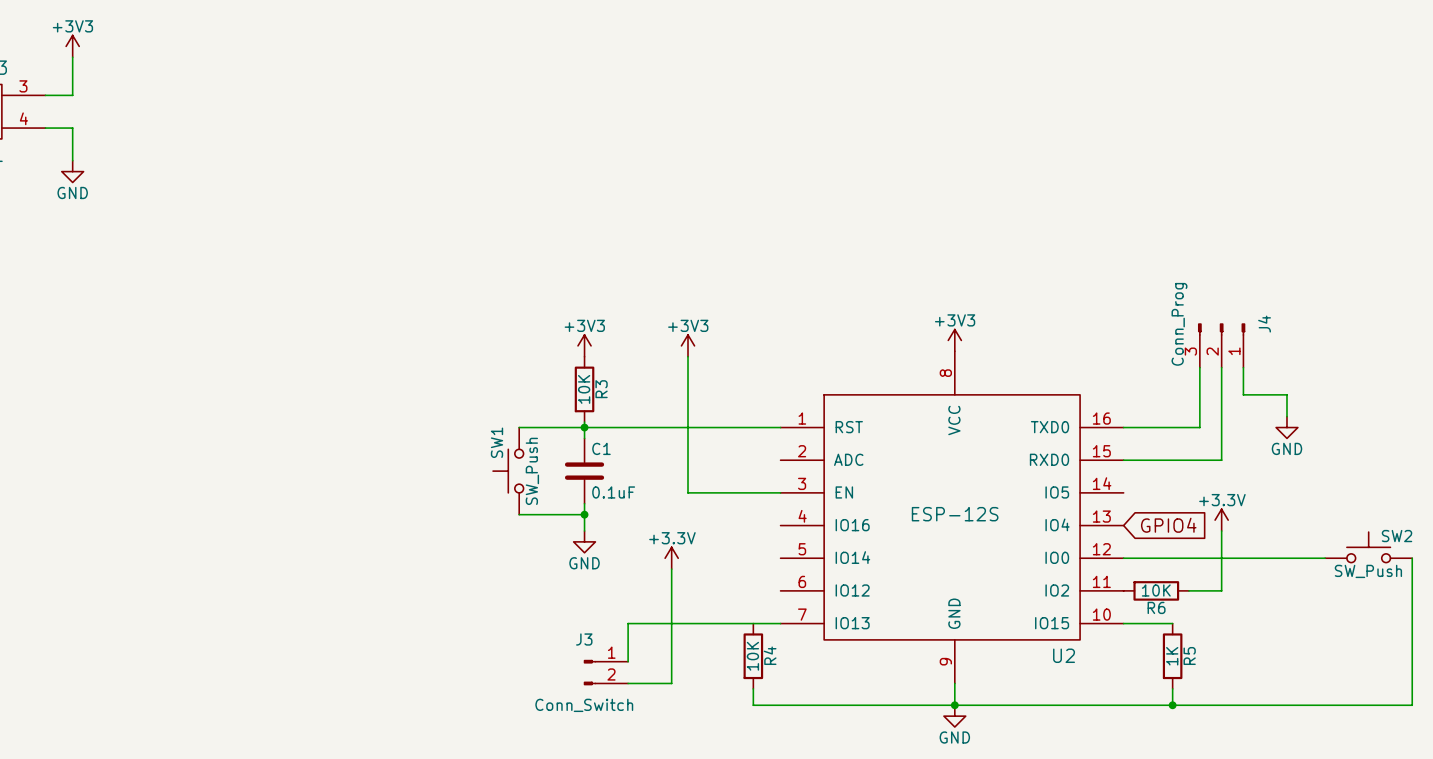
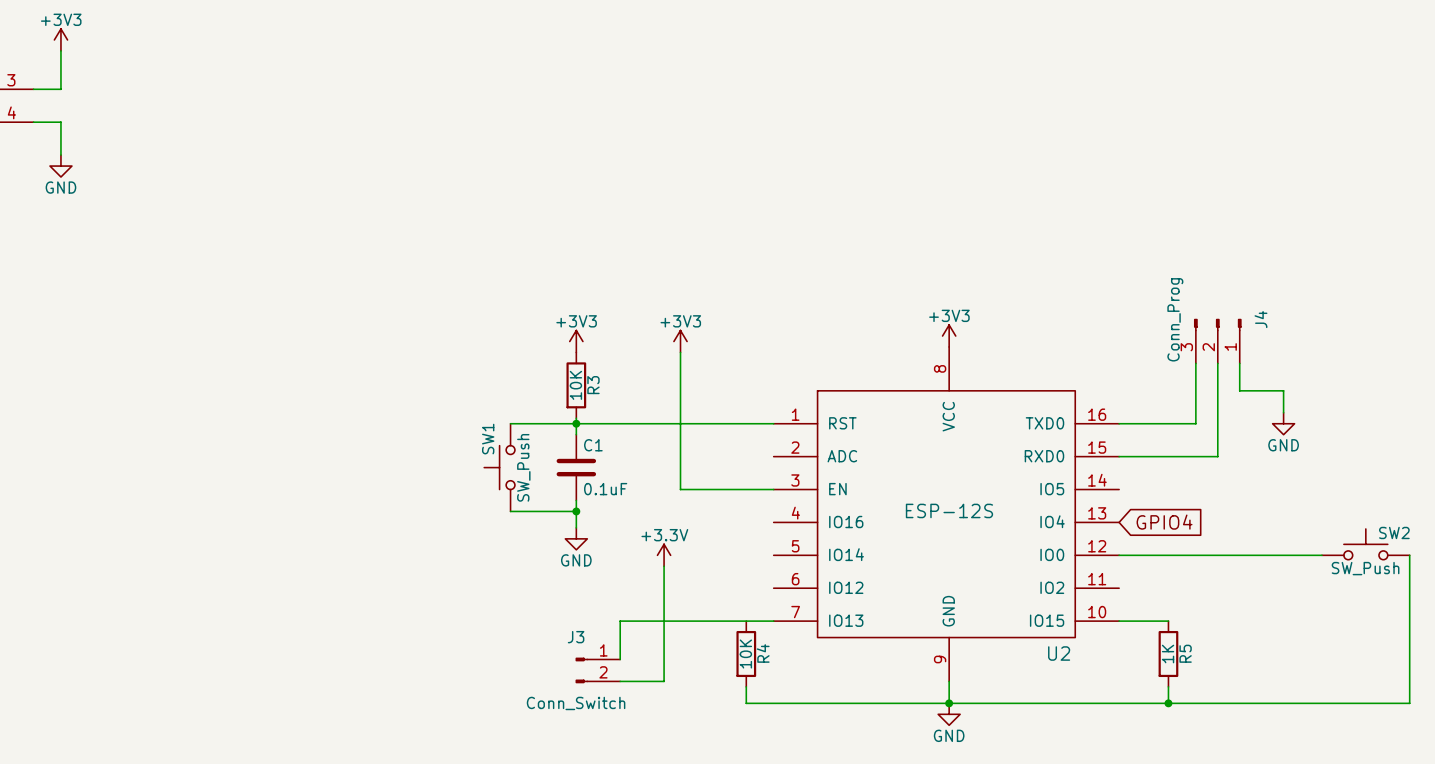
power symbol: +3.3V (1221, 520) -> none
wire: (1221, 531) (1221, 590) (1188, 590) -> none
R6: 10K (1156, 590) -> none

